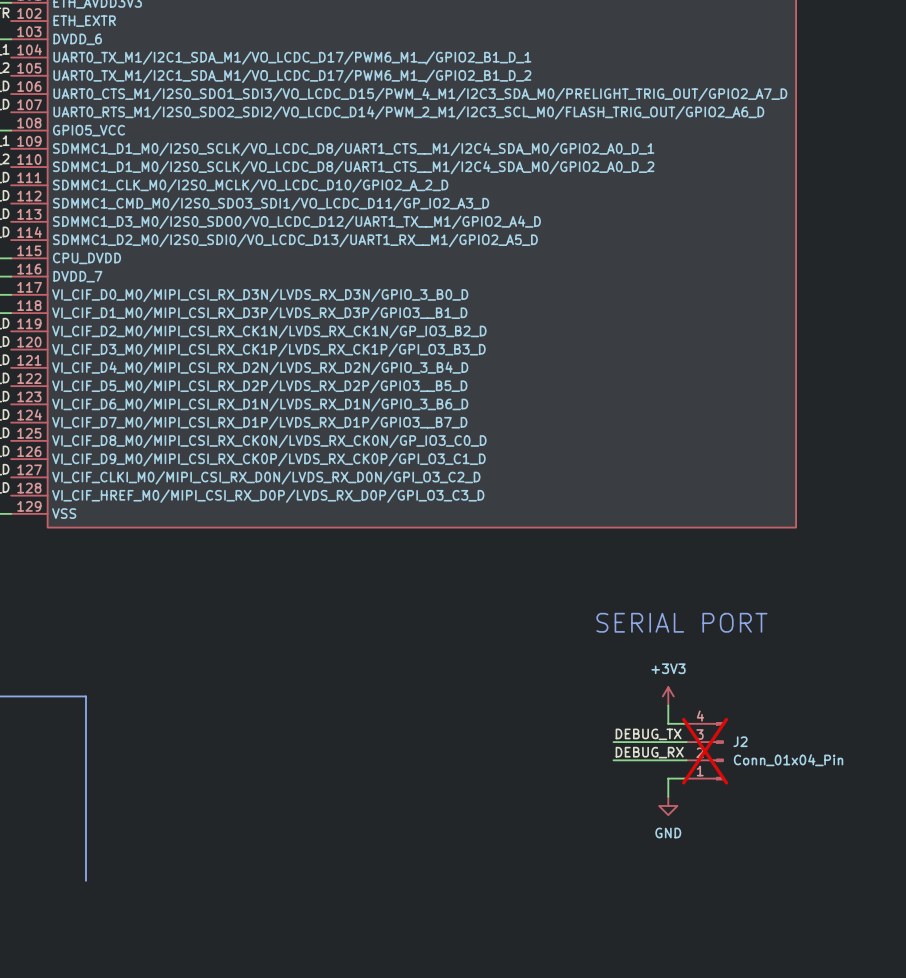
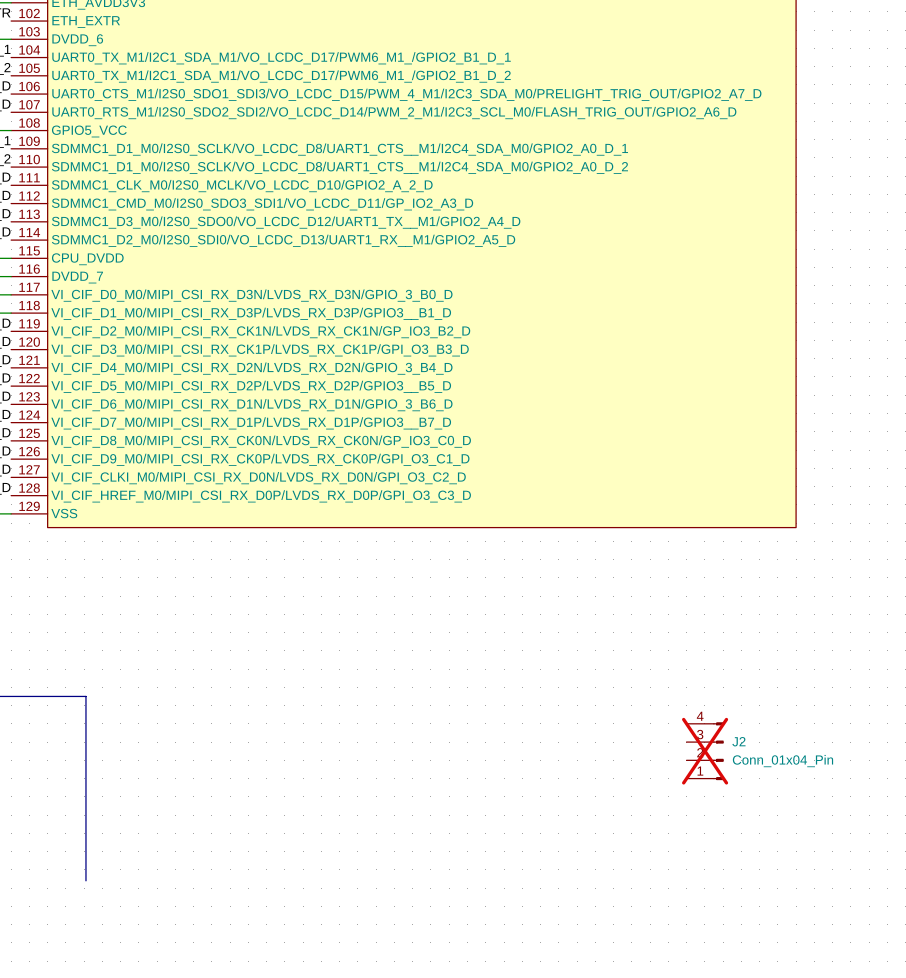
text: SERIAL PORT (681, 622) -> none
power symbol: +3V3 (668, 696) -> none
wire: (668, 705) (668, 723) (686, 723) -> none
label: DEBUG_TX (648, 734) -> none
wire: (613, 742) (686, 742) -> none
label: DEBUG_RX (649, 752) -> none
wire: (613, 760) (686, 760) -> none
wire: (686, 778) (668, 778) (668, 796) -> none
power symbol: GND (668, 805) -> none

